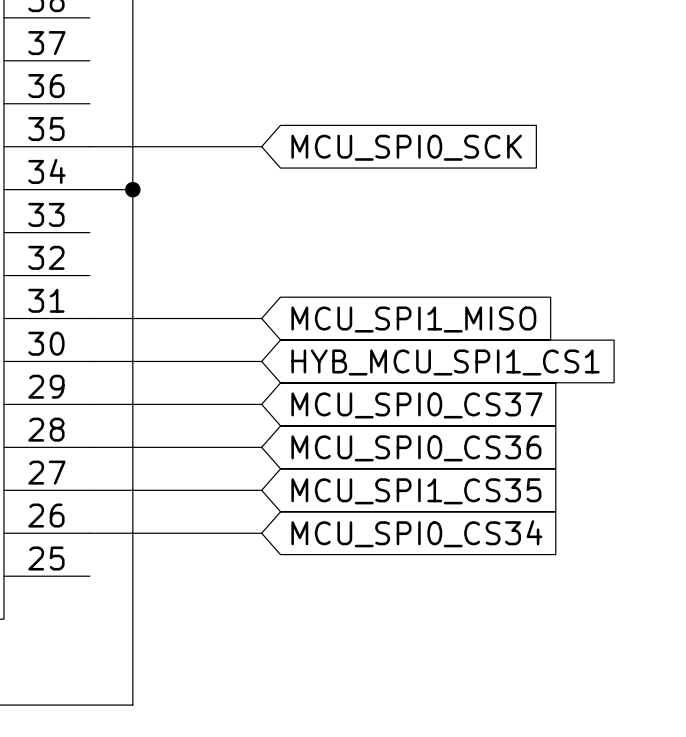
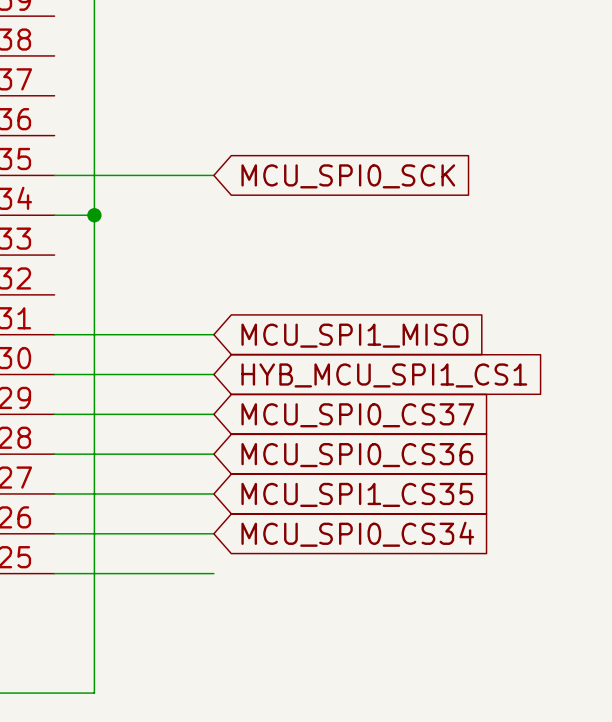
wire: none -> (54, 573) (213, 573)

